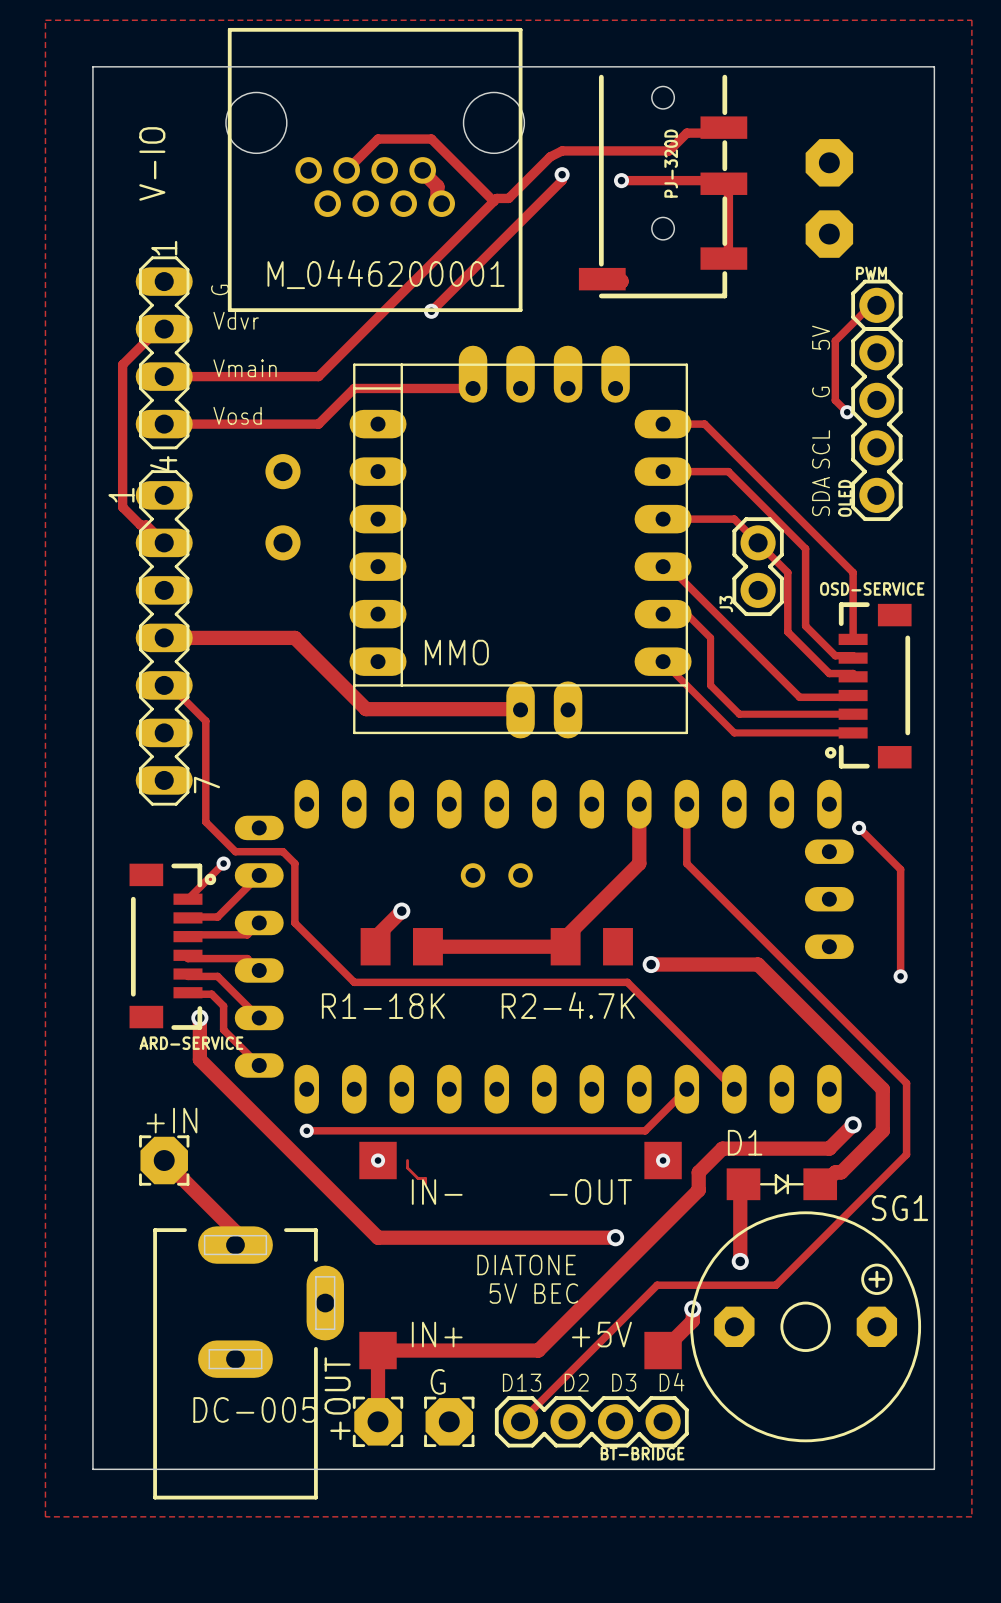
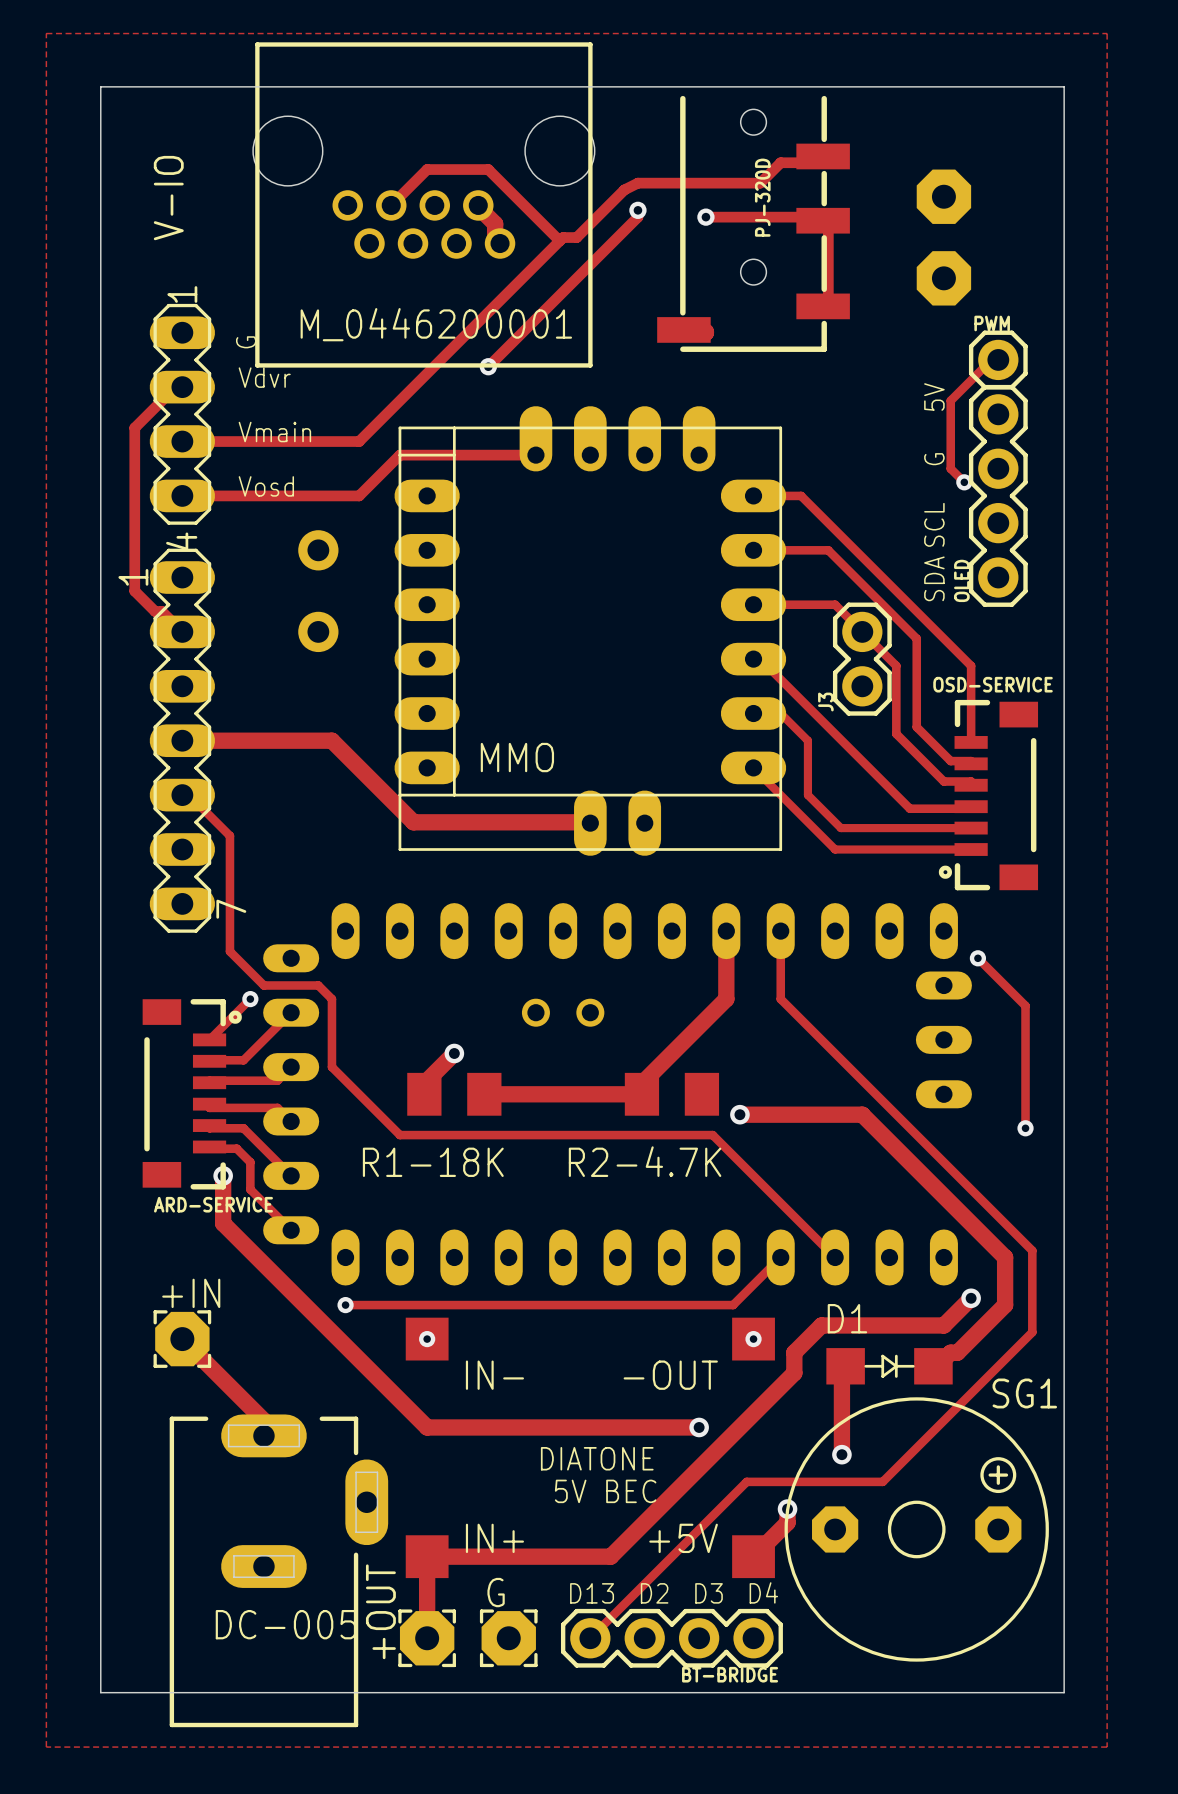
track: (407, 1160) (407, 1167) (418, 1178) (425, 1178) (425, 1184) -> none

